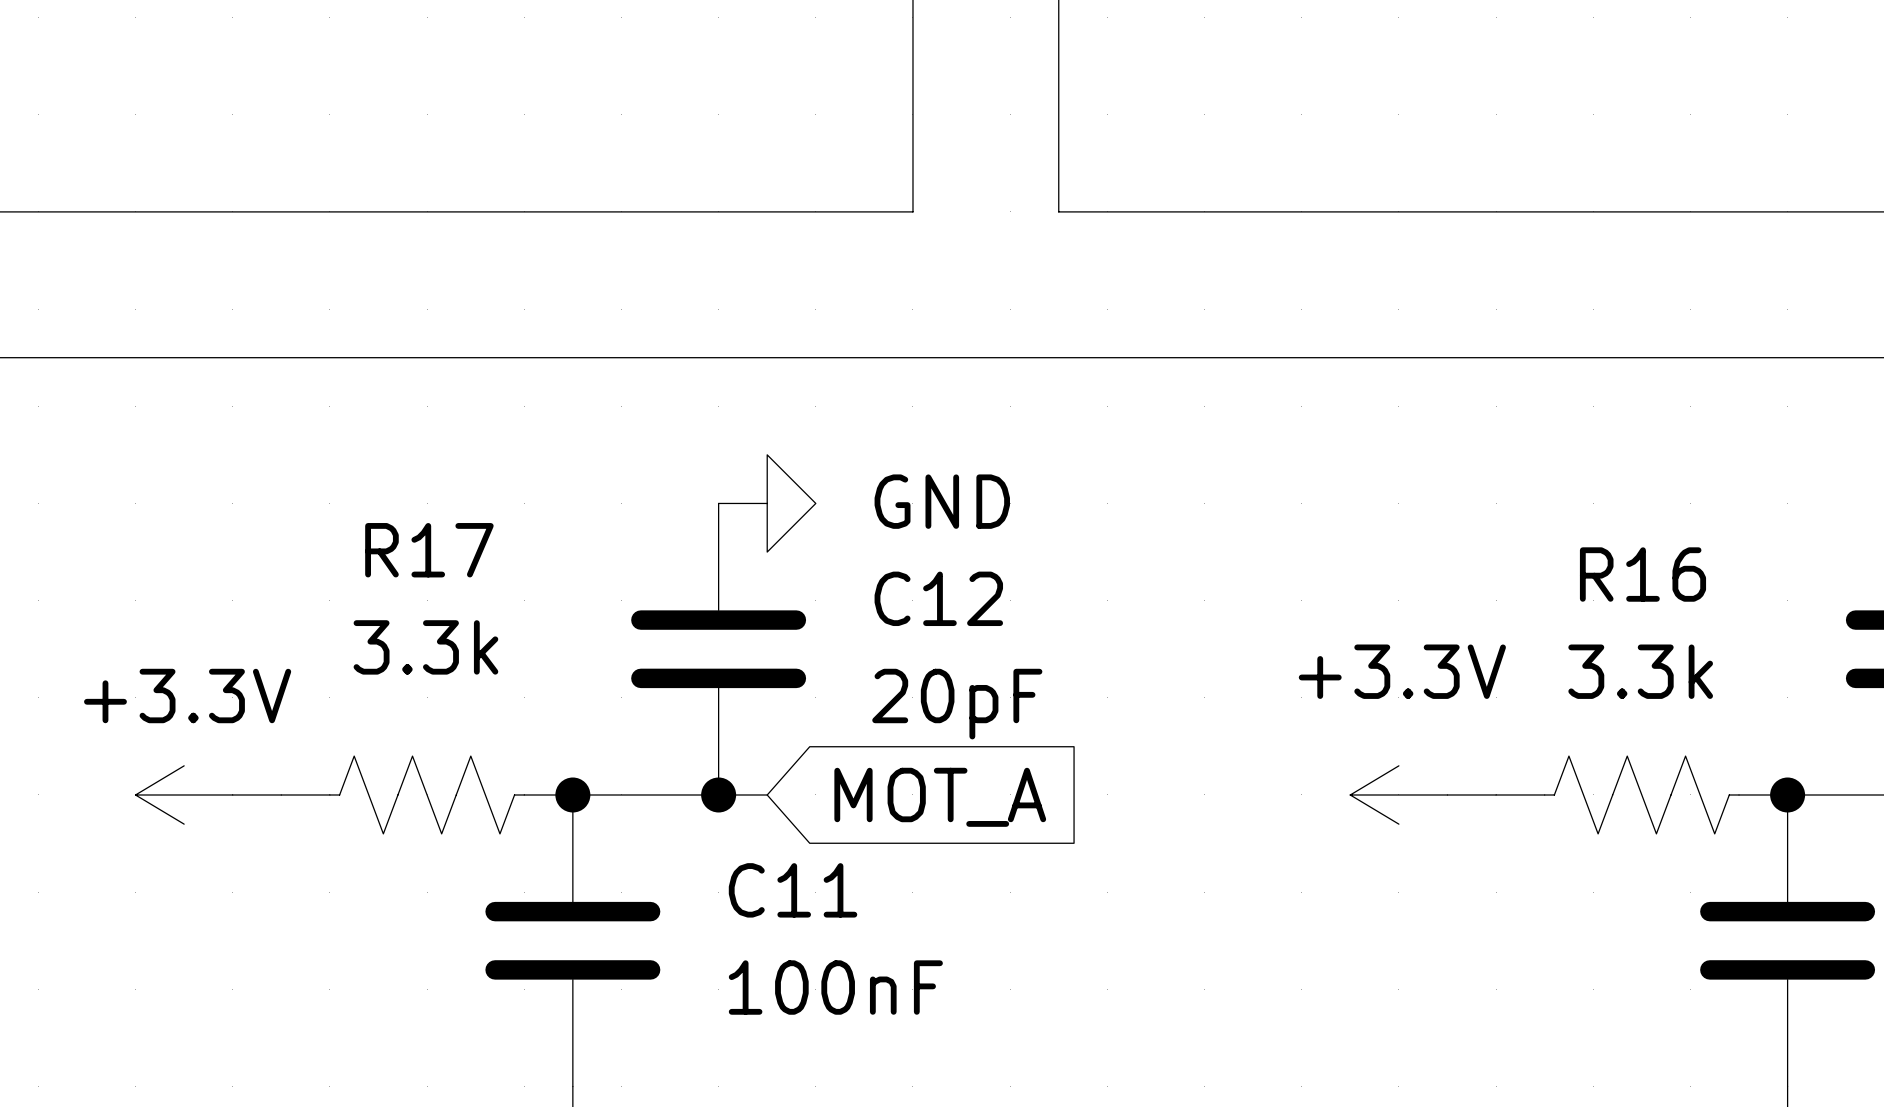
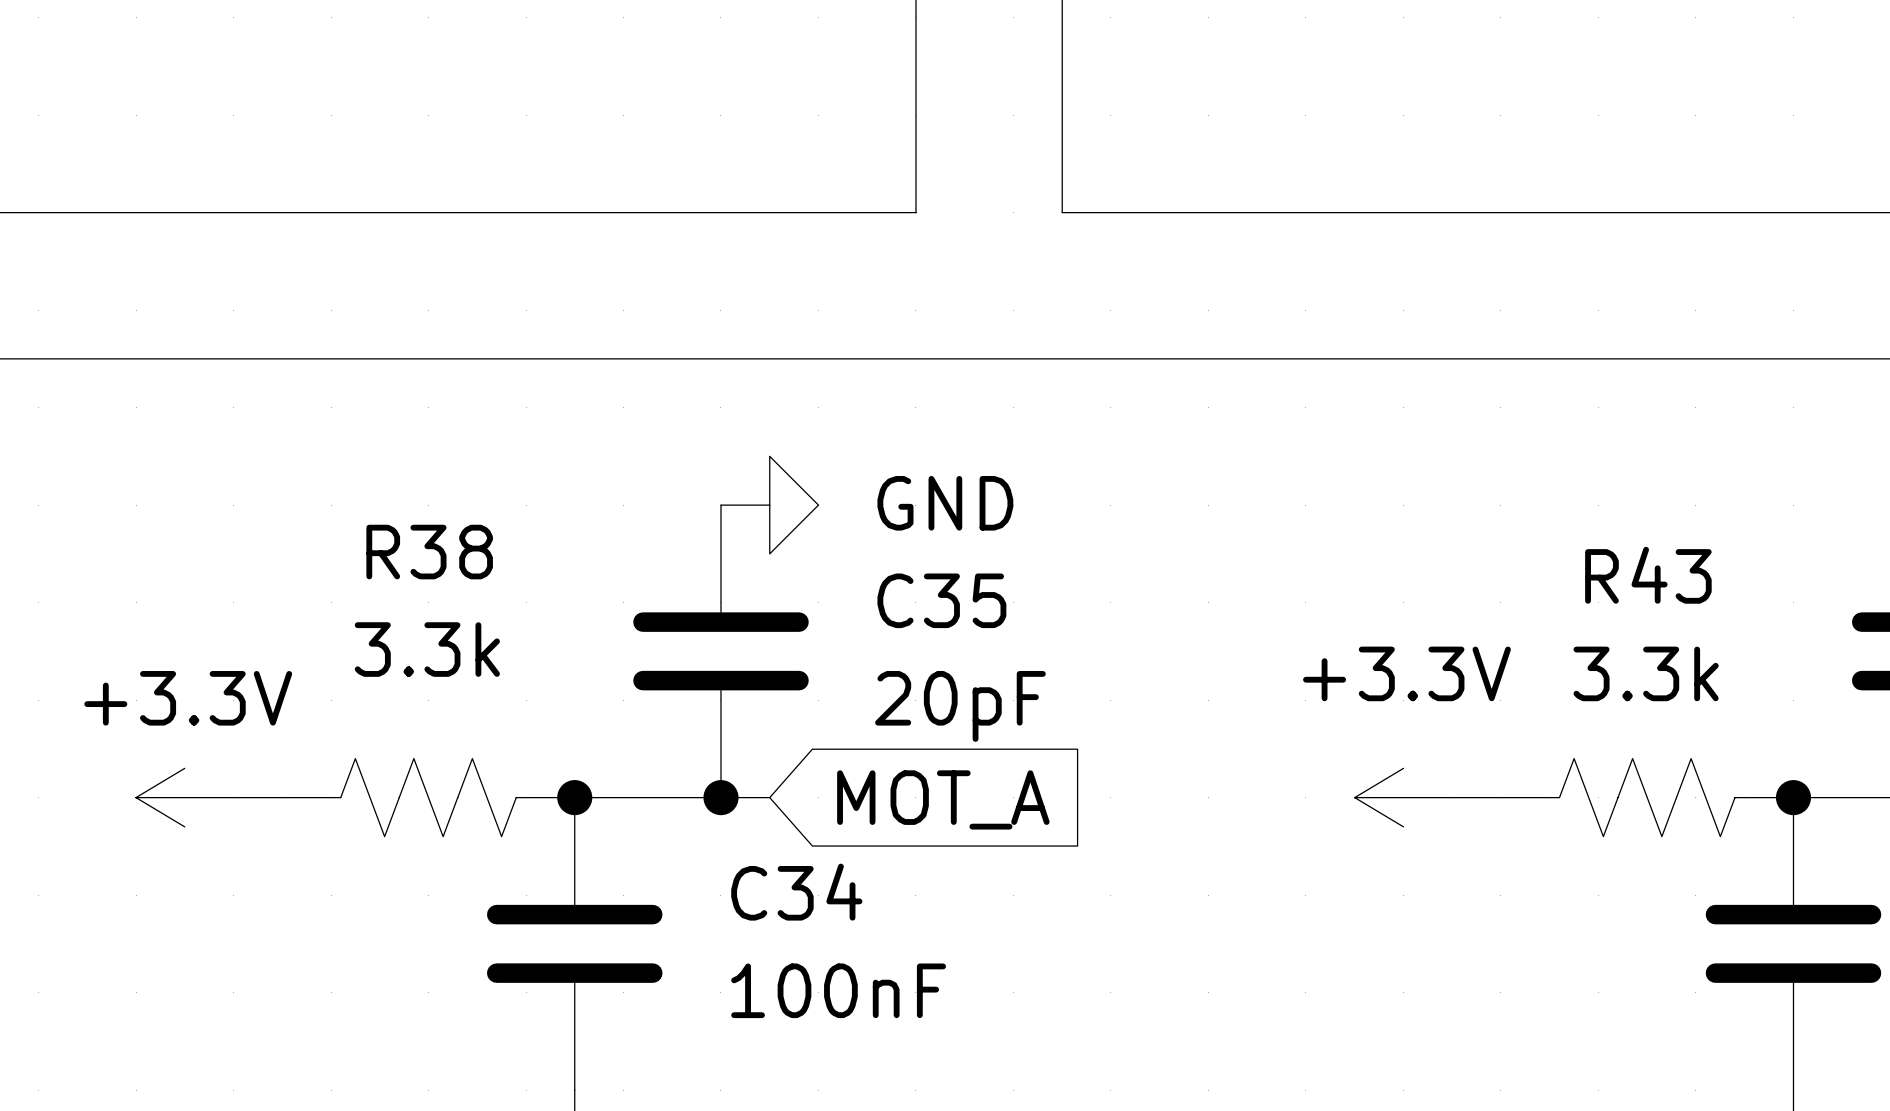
R17 name: R17 (429, 550) -> R38 (429, 552)
R16 name: R16 (1642, 574) -> R43 (1648, 575)
C12 name: C12 (938, 598) -> C35 (941, 600)
C11 name: C11 (793, 890) -> C34 (796, 892)

